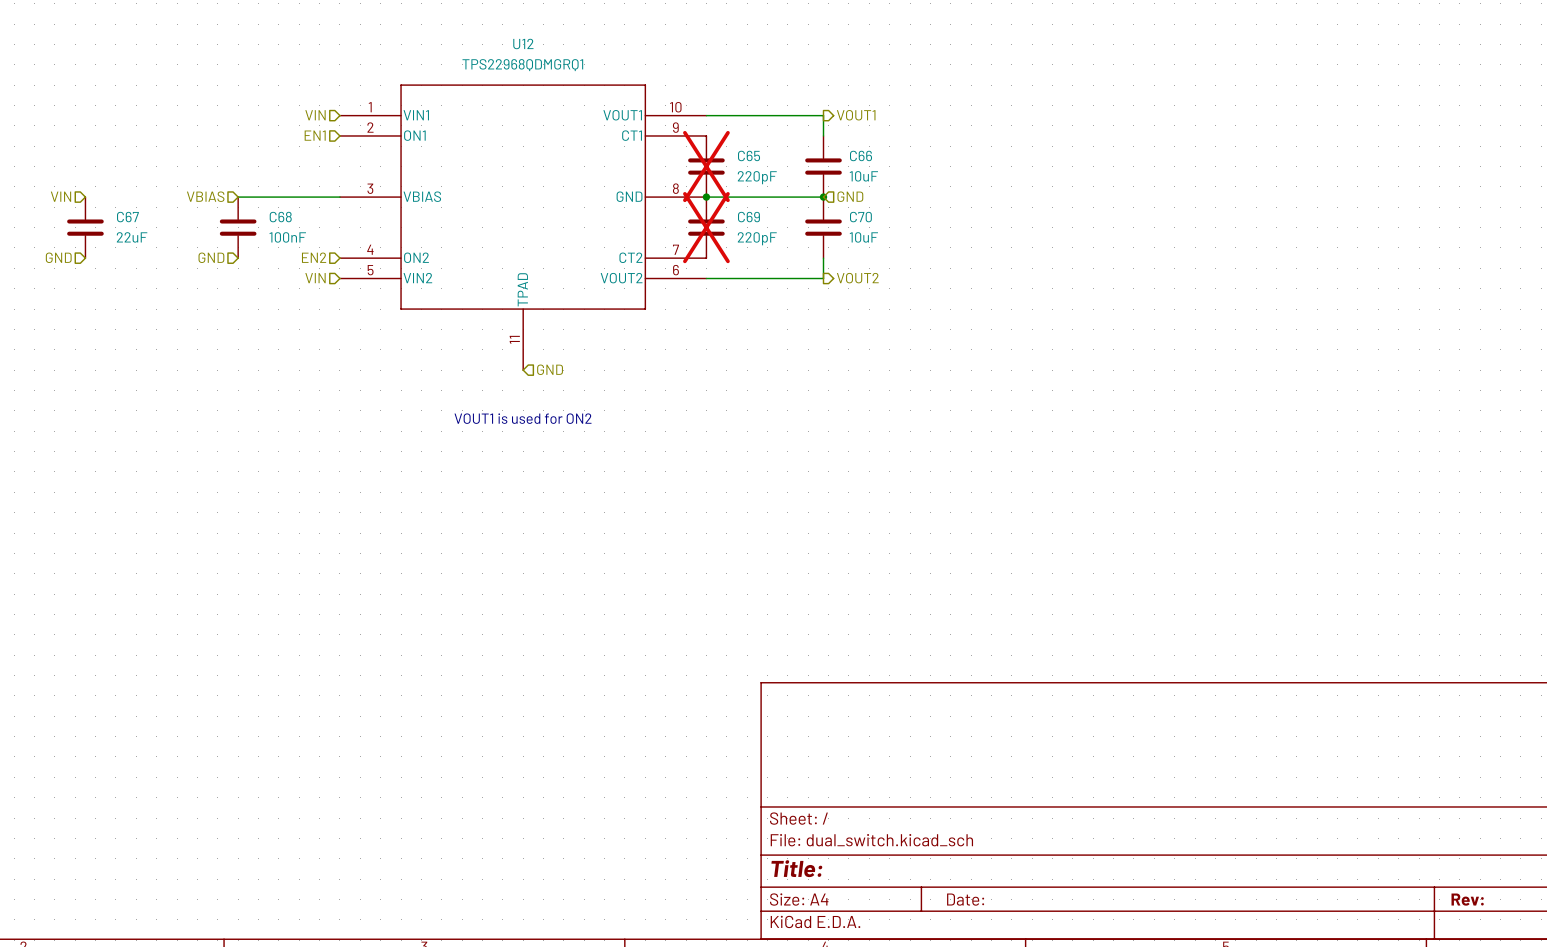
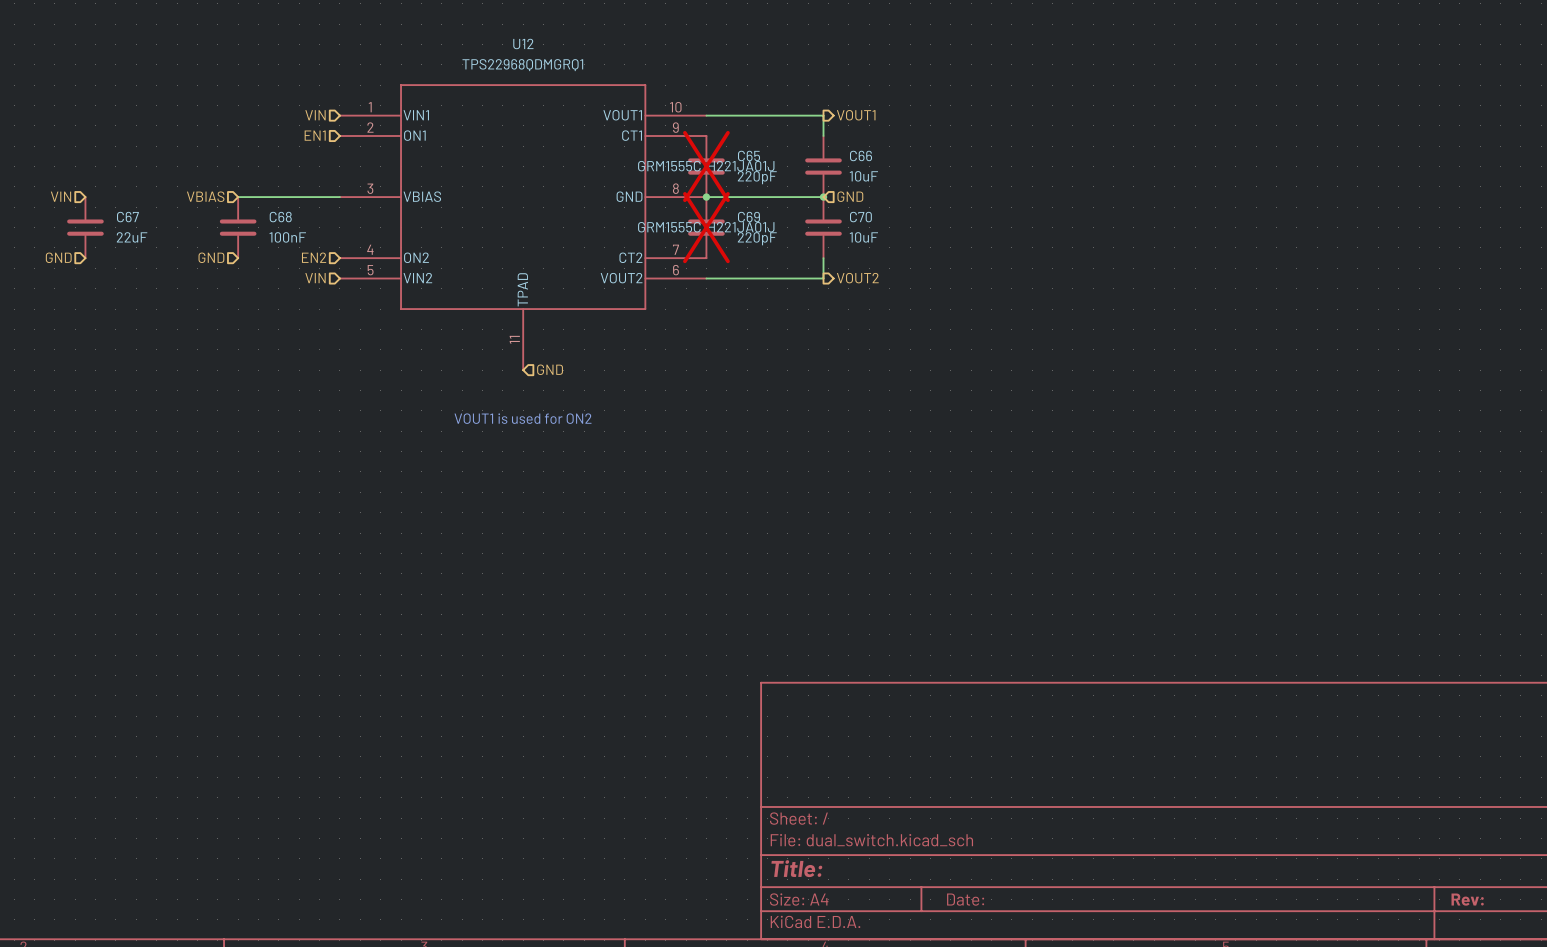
C65 text: none -> GRM1555C1H221JA01J (706, 166)
C69 text: none -> GRM1555C1H221JA01J (706, 227)

